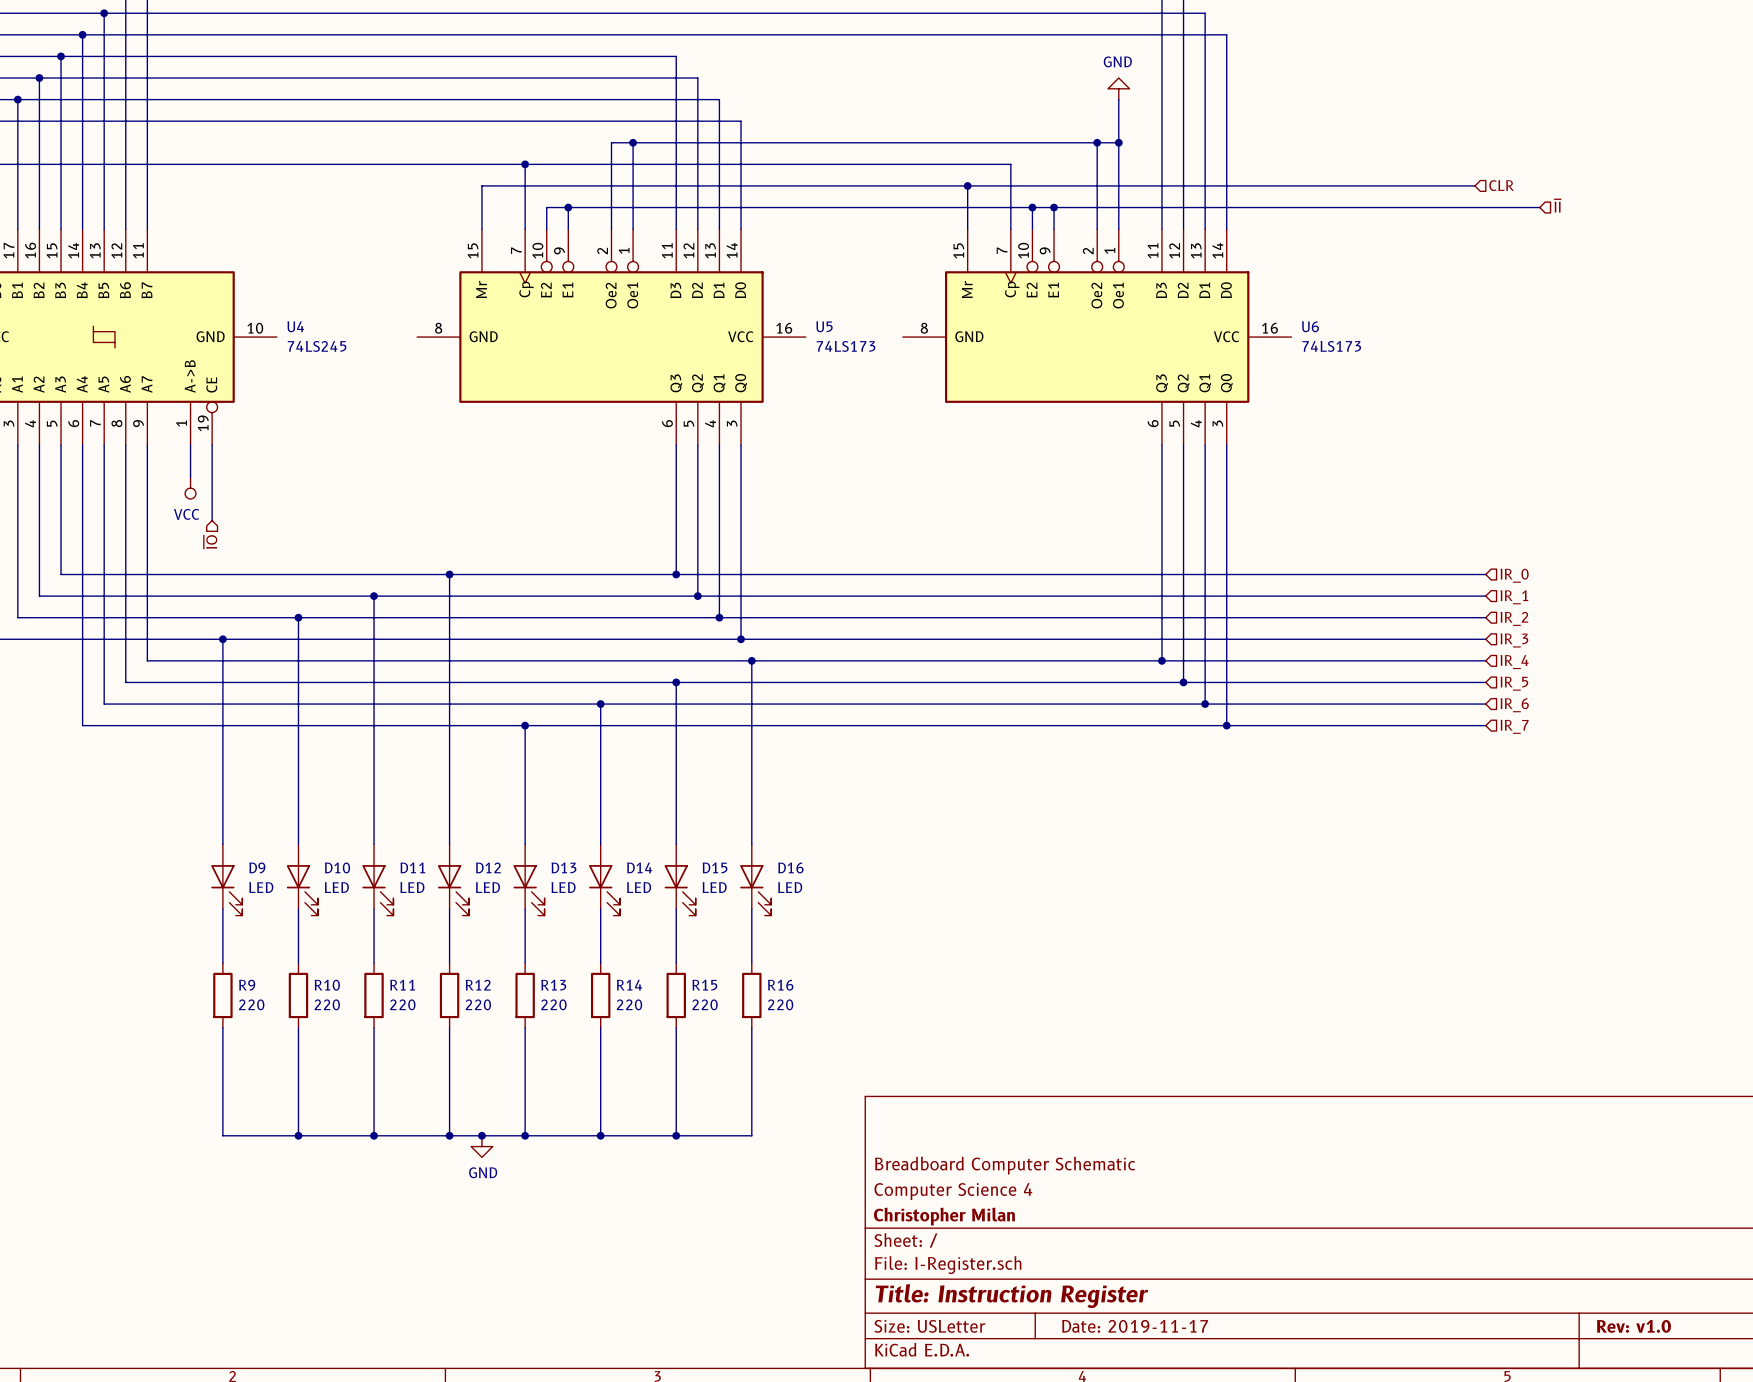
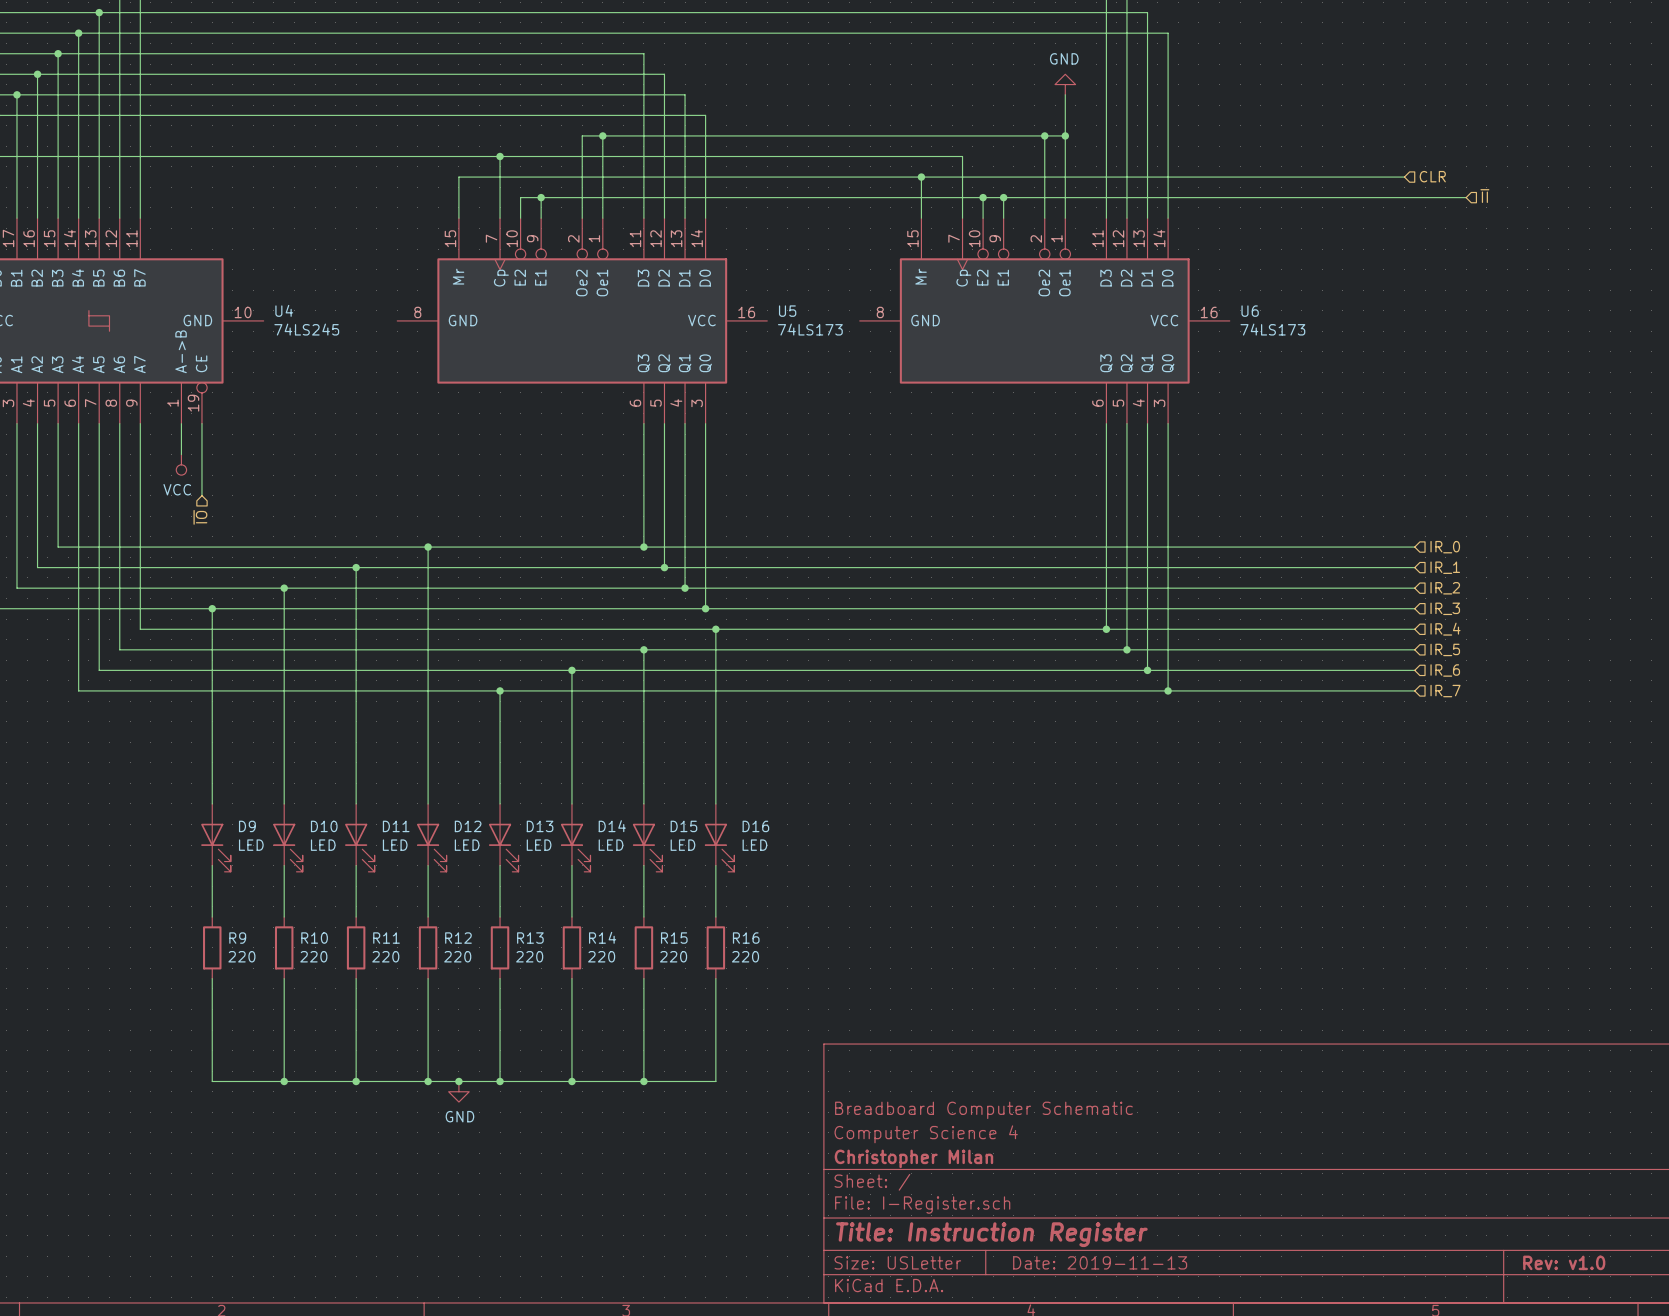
title block: Date: 2019-11-17 (1135, 1326) -> Date: 2019-11-13 (1100, 1262)

